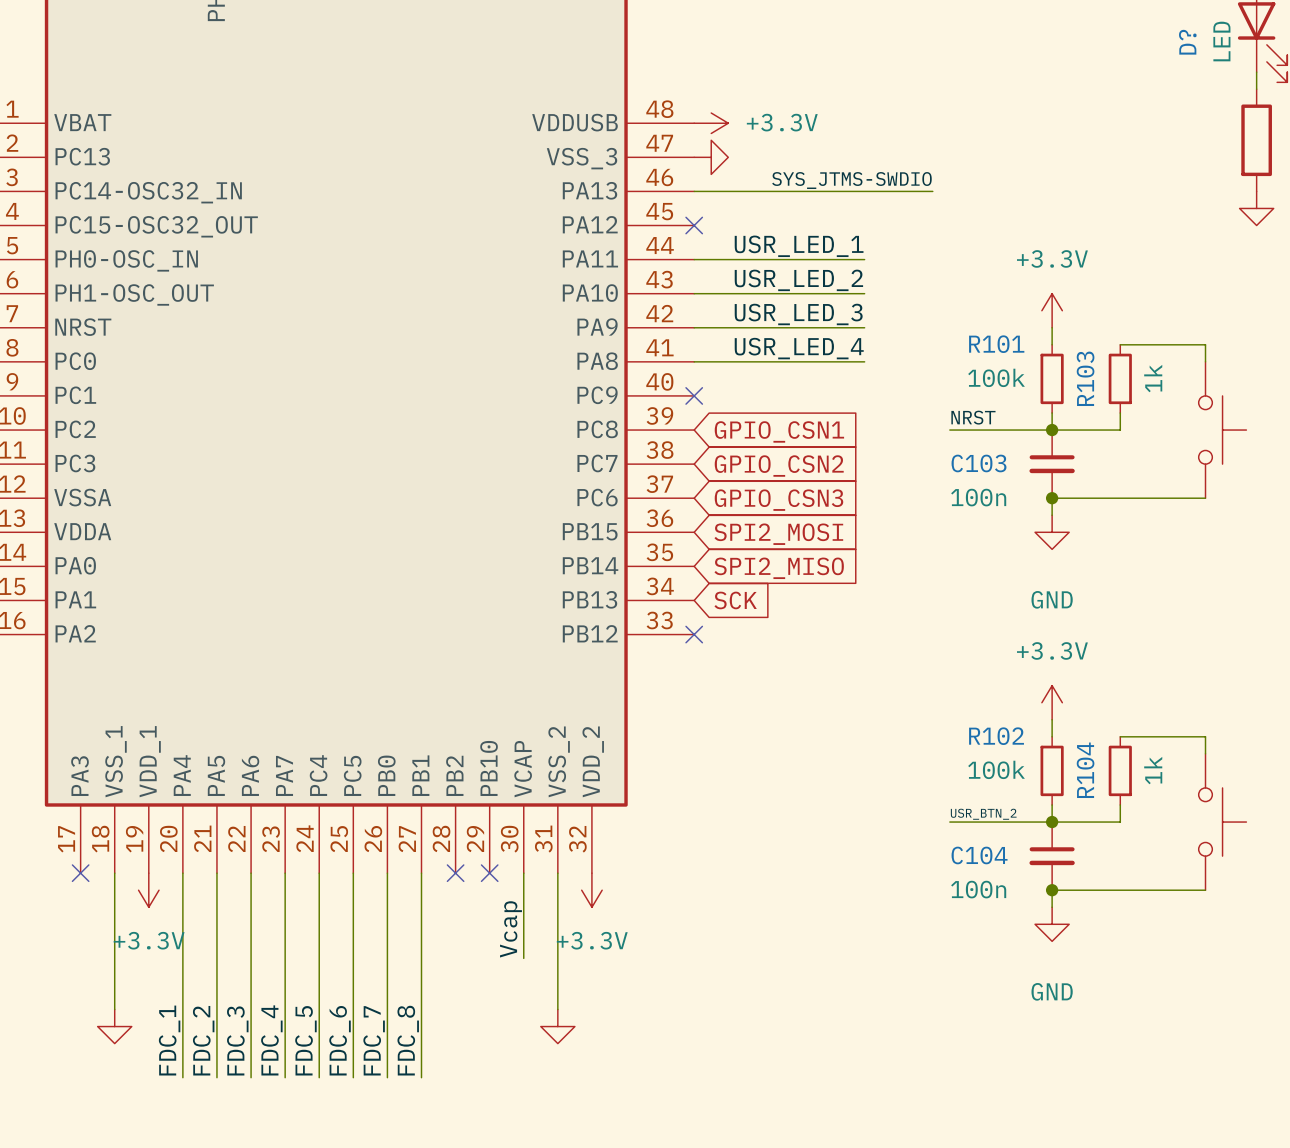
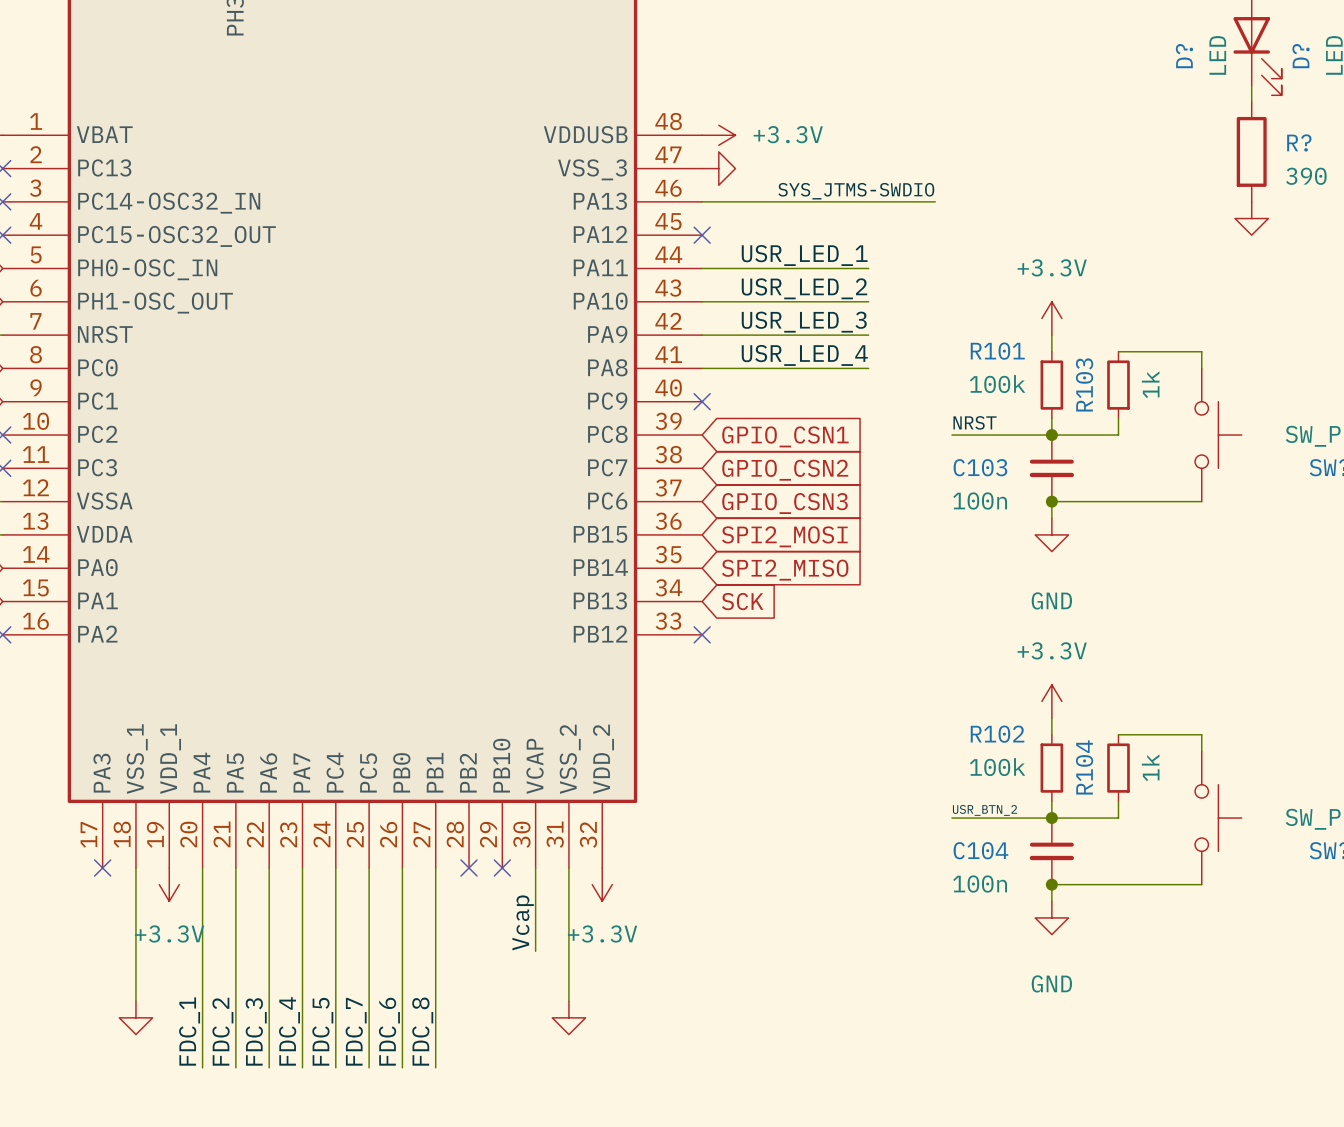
label: FDC_6 (340, 1040) -> FDC_7 (356, 1031)
label: FDC_7 (374, 1040) -> FDC_6 (389, 1031)

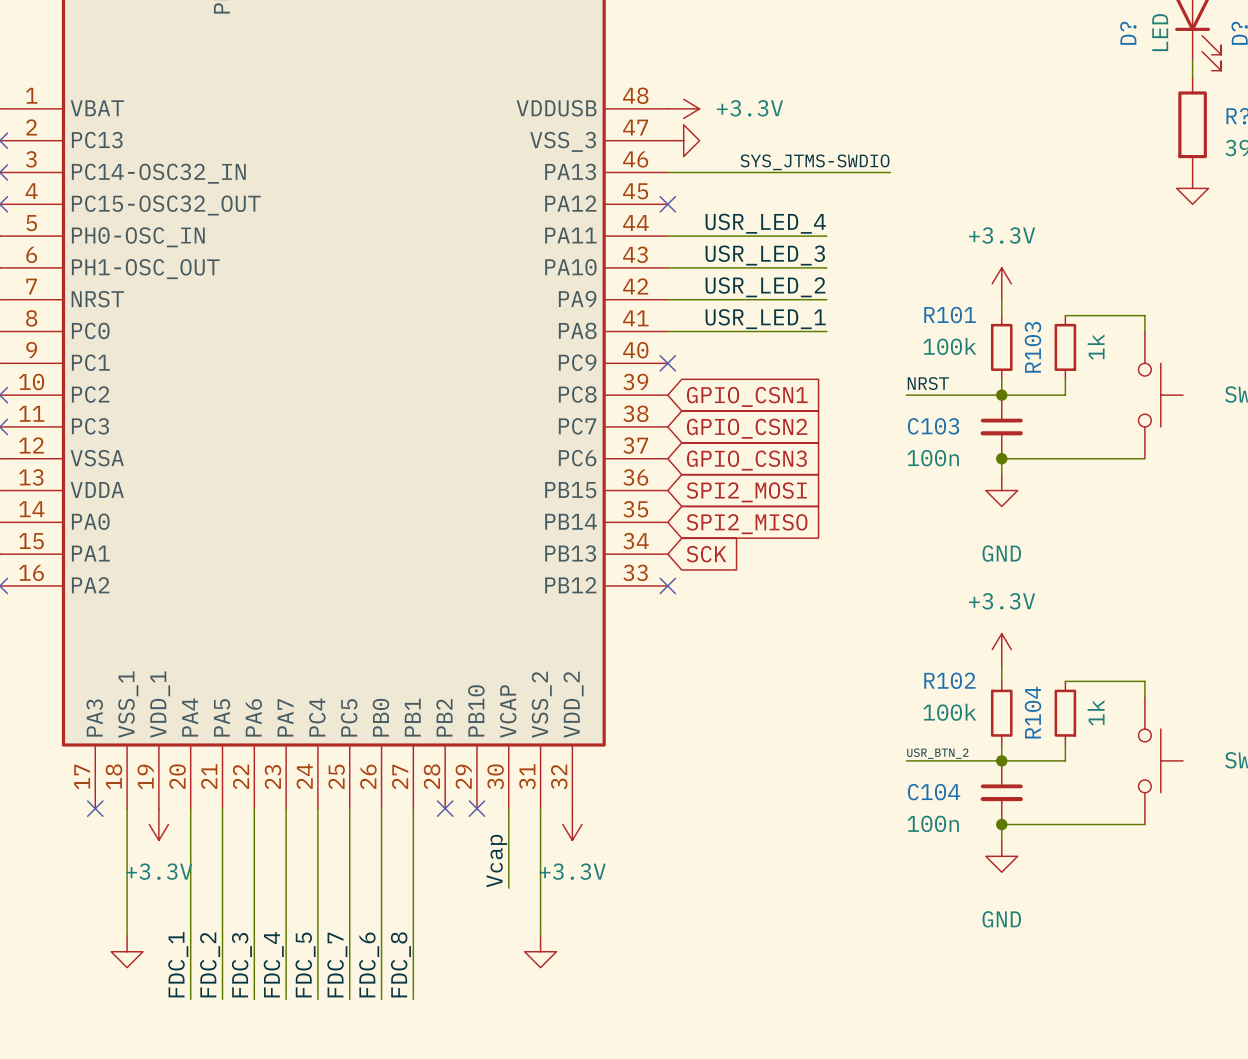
label: USR_LED_1 (804, 255) -> USR_LED_4 (765, 223)
label: USR_LED_2 (804, 288) -> USR_LED_3 (765, 255)
label: USR_LED_3 (804, 322) -> USR_LED_2 (765, 287)
label: USR_LED_4 (804, 355) -> USR_LED_1 (765, 319)

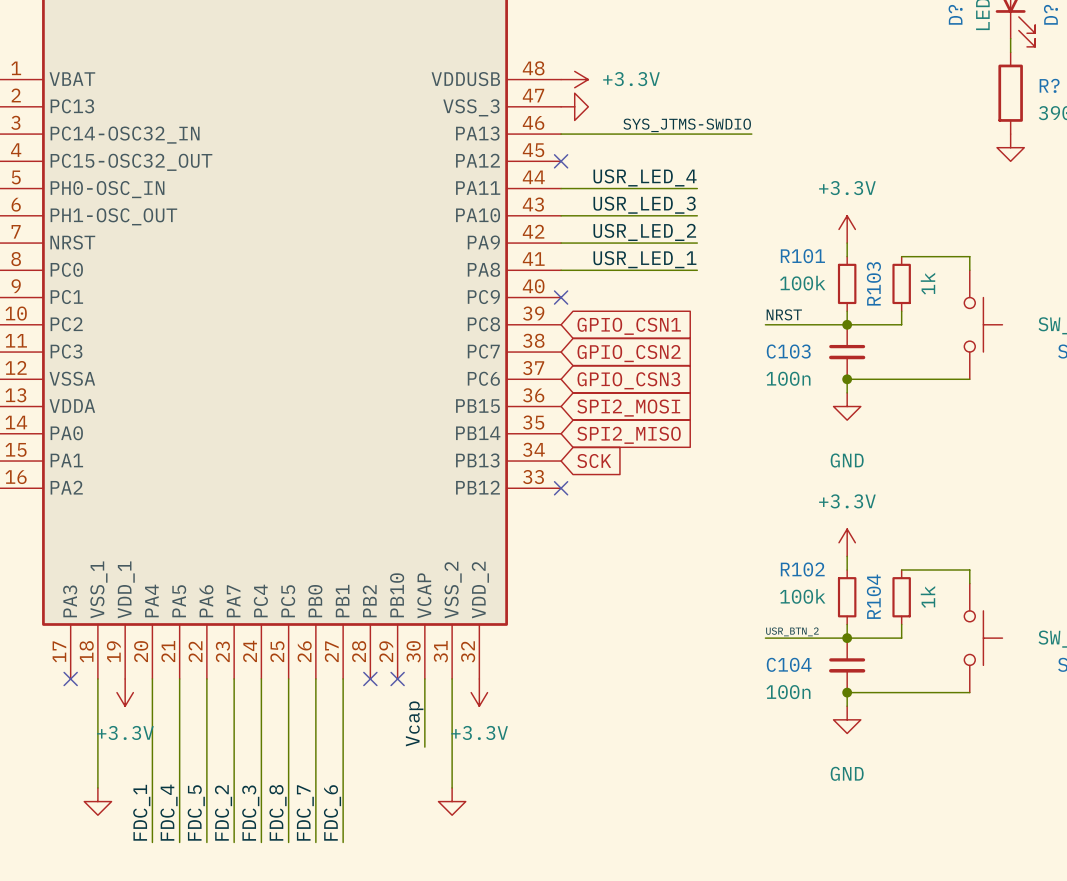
label: FDC_2 (210, 964) -> FDC_4 (169, 812)
label: FDC_4 (273, 964) -> FDC_2 (223, 812)
label: FDC_6 (369, 964) -> FDC_7 (305, 812)
label: FDC_8 (400, 964) -> FDC_6 (332, 812)
label: FDC_3 (241, 965) -> FDC_5 (196, 812)
label: FDC_5 (305, 965) -> FDC_3 (250, 813)
label: FDC_7 (337, 965) -> FDC_8 (278, 812)

